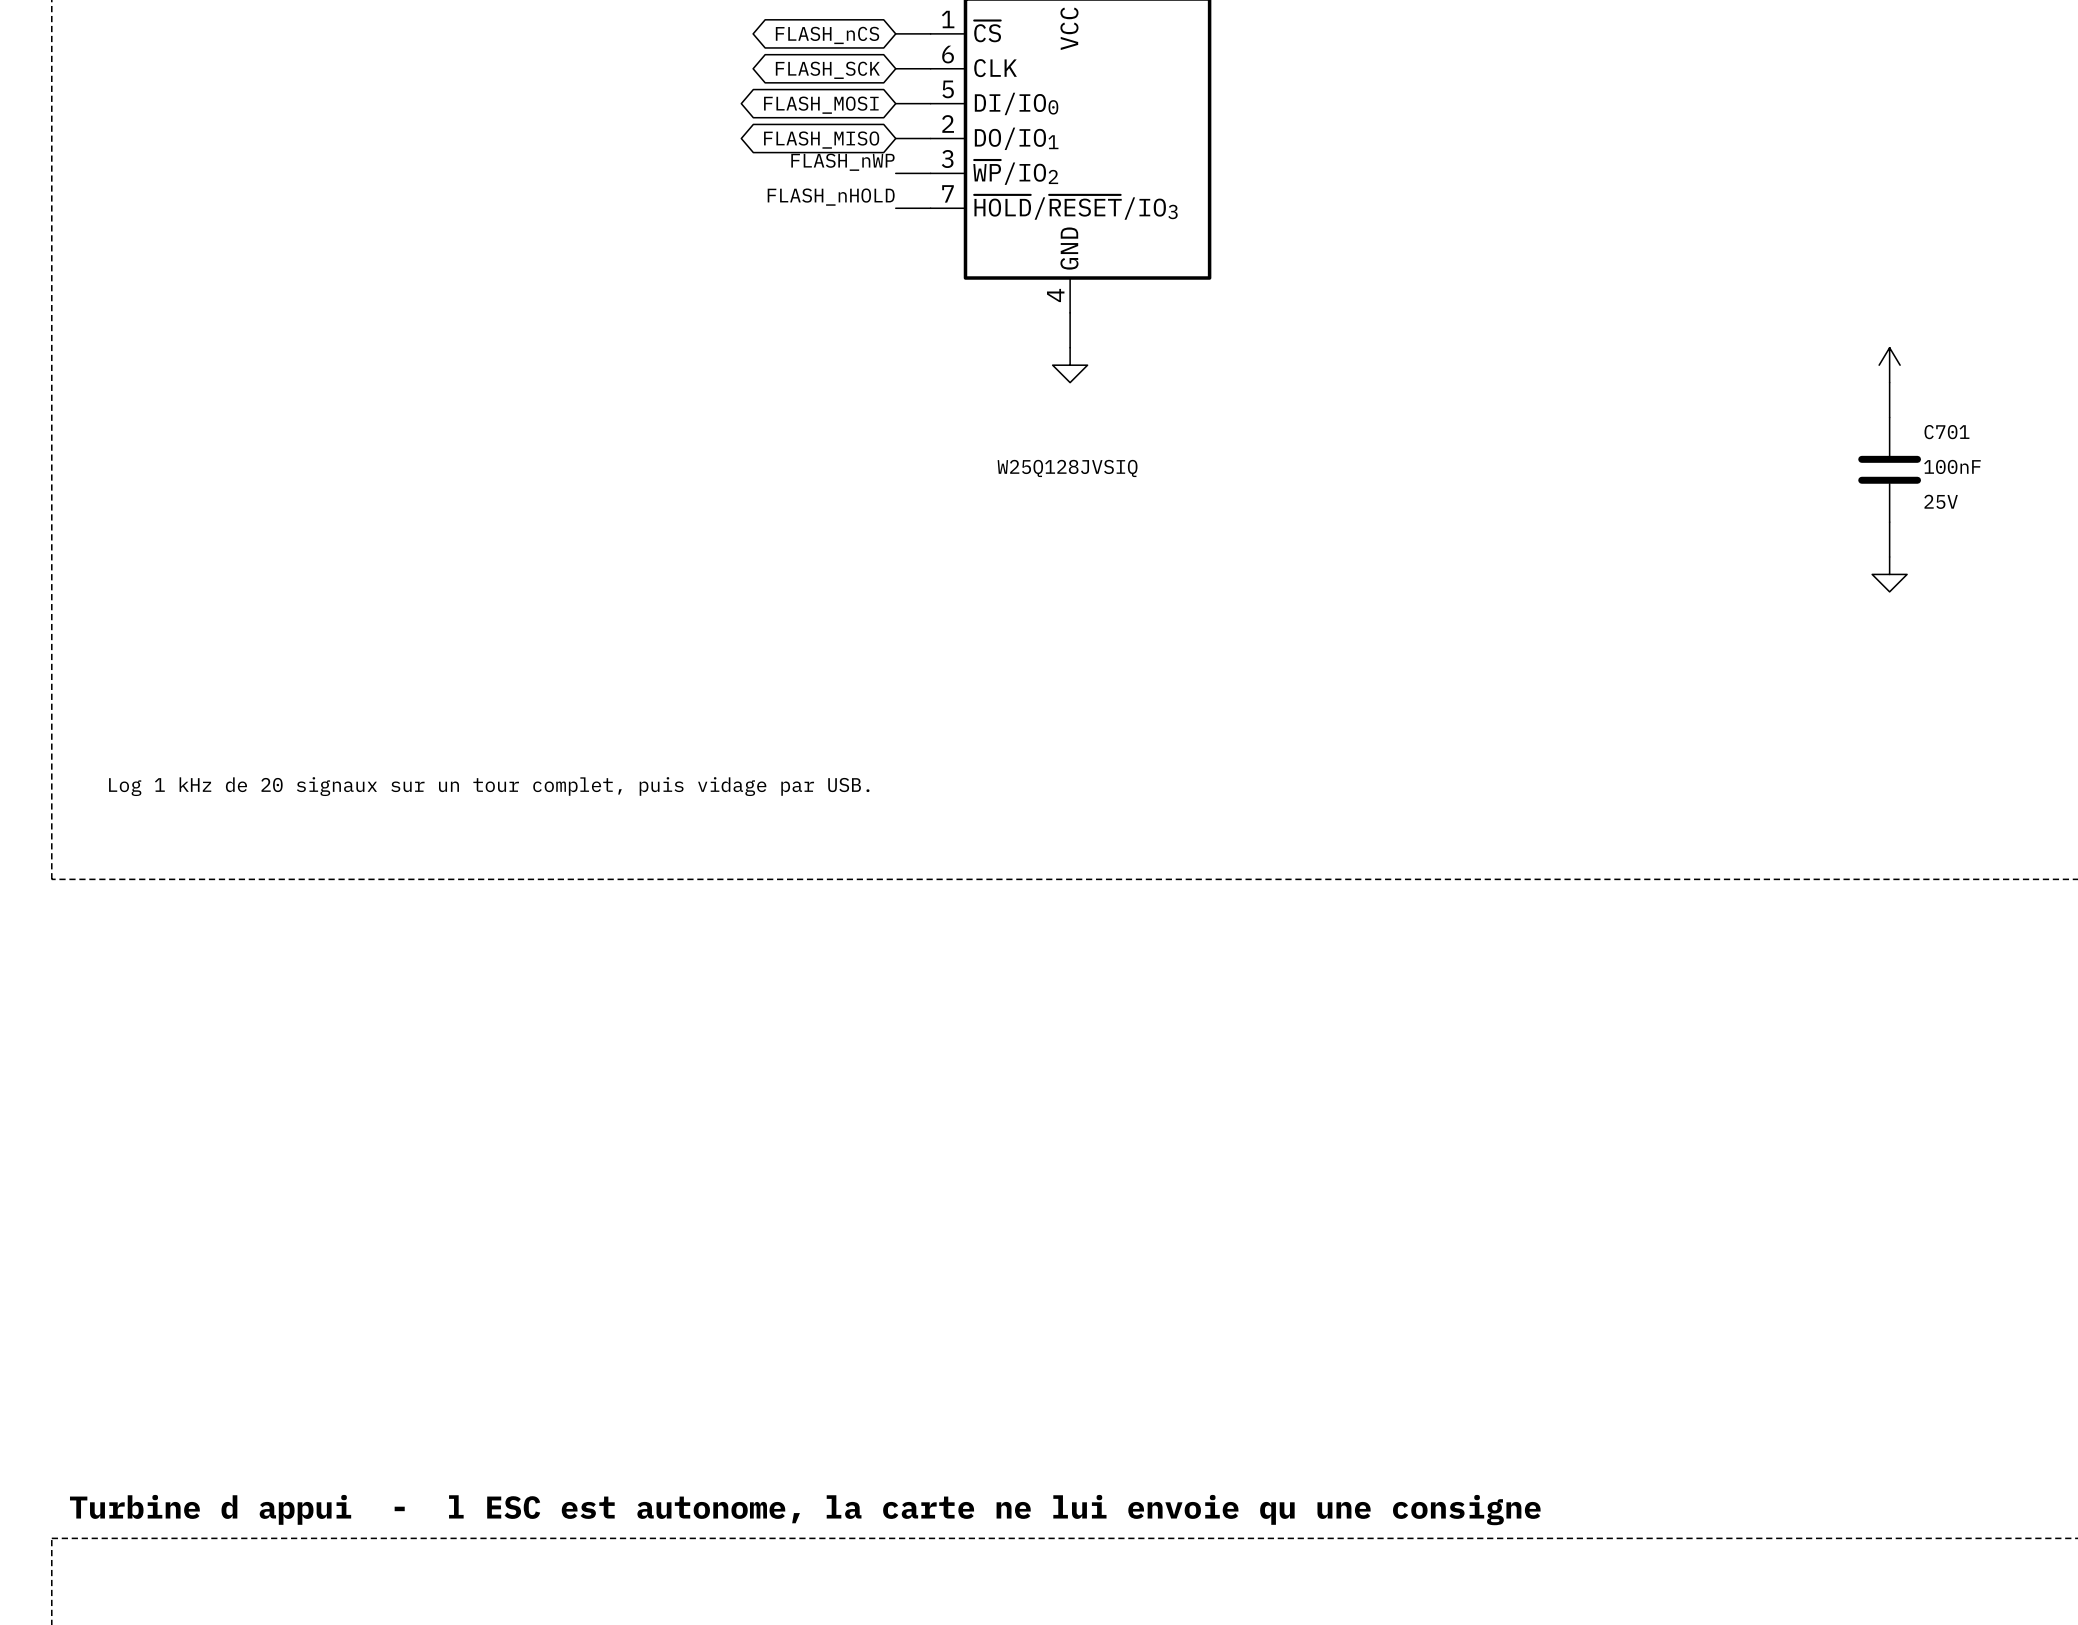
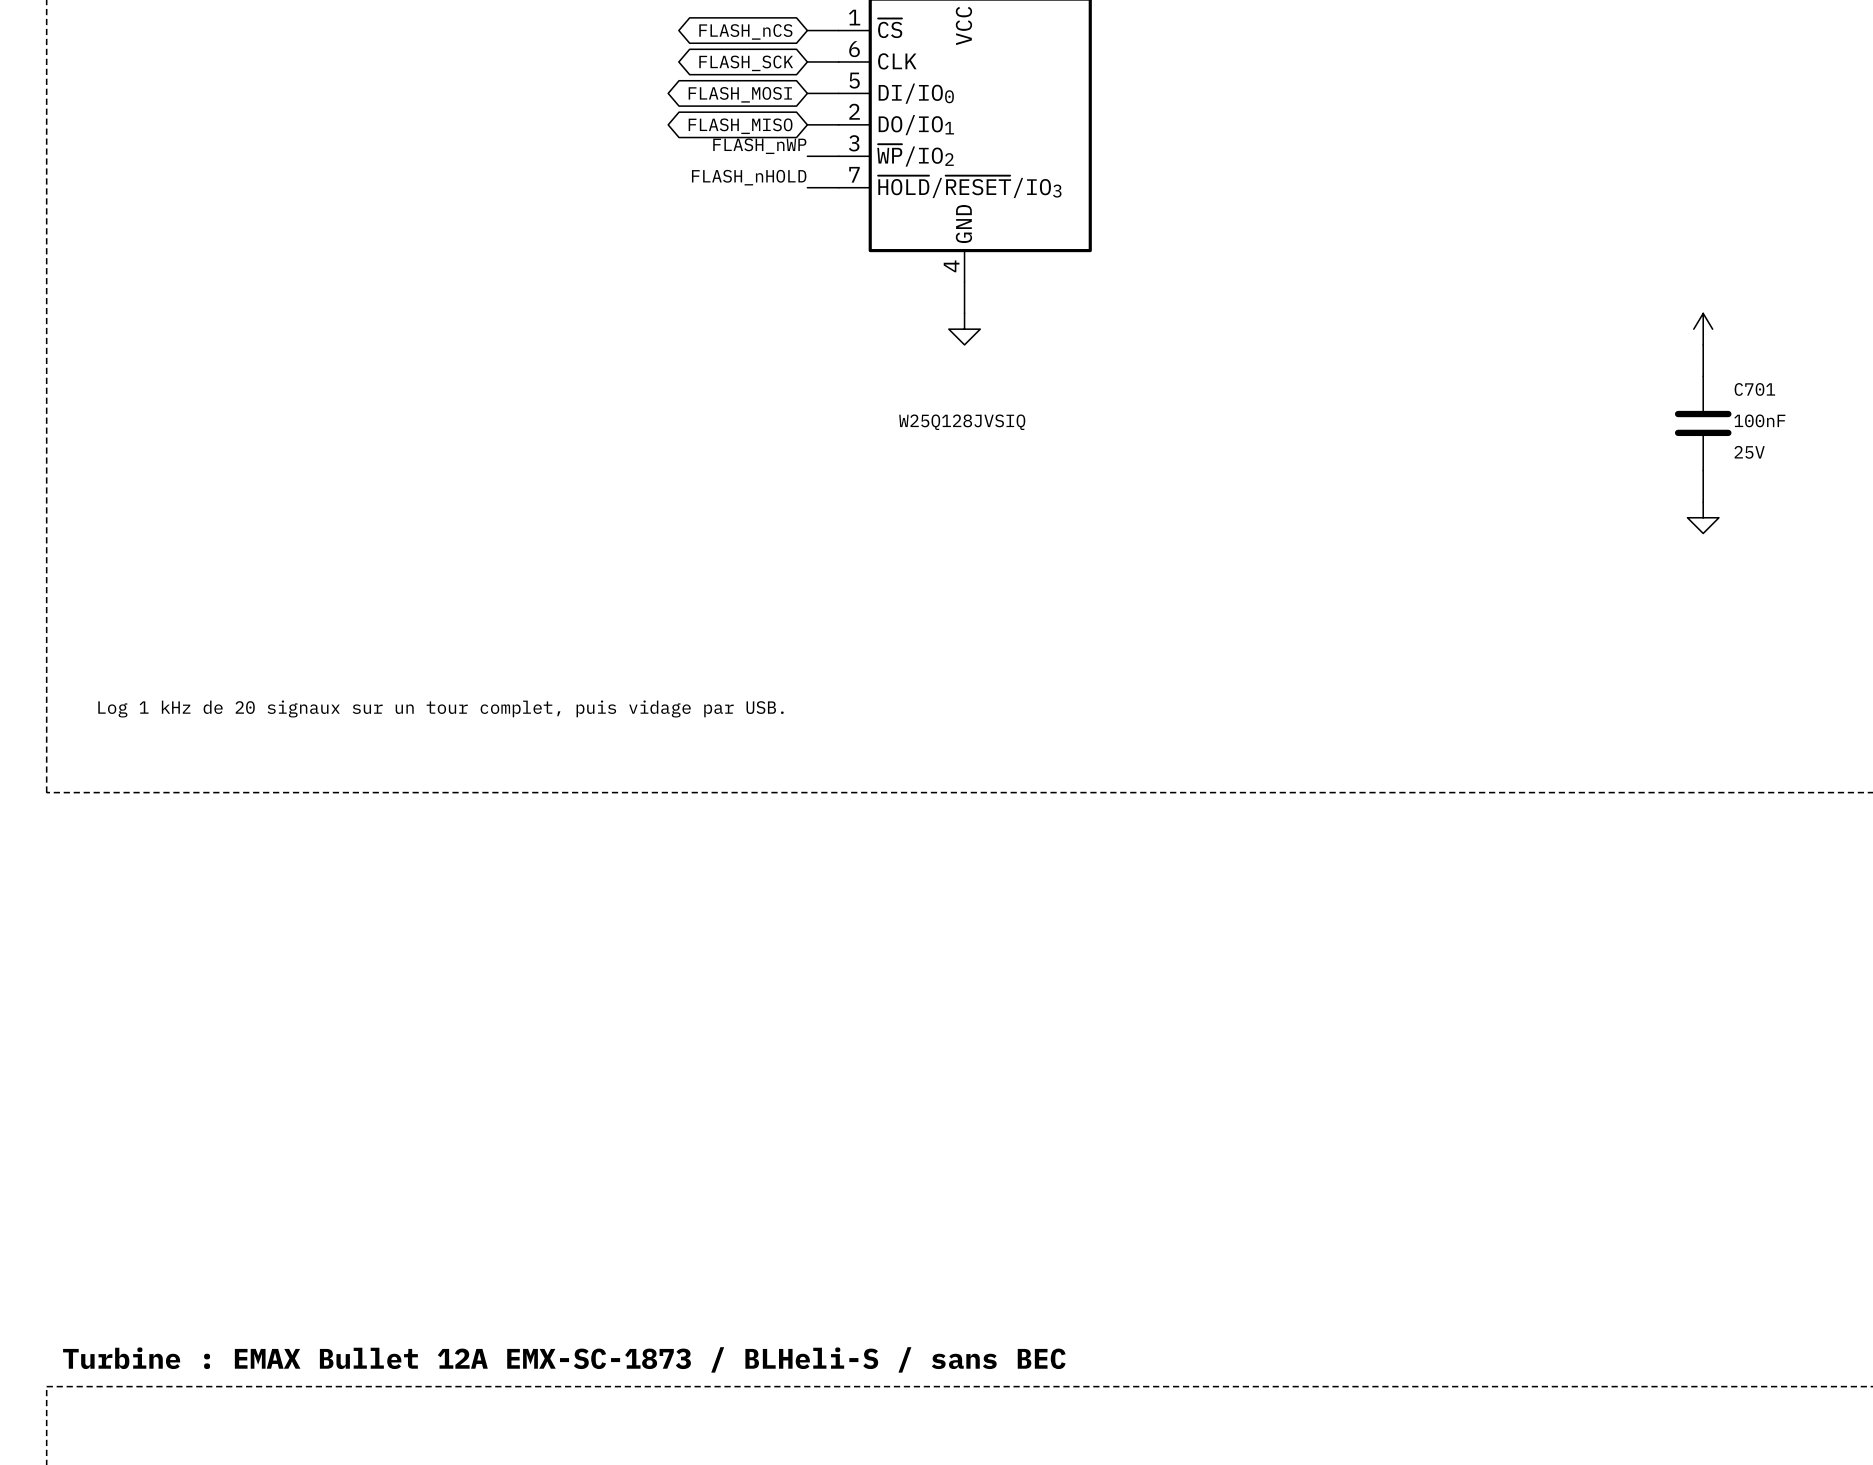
text: Turbine d appui - l ESC est autonome, la carte ne lui envoie qu une consigne (805, 1510) -> Turbine : EMAX Bullet 12A EMX-SC-1873 / BLHeli-S / sans BEC (564, 1359)

